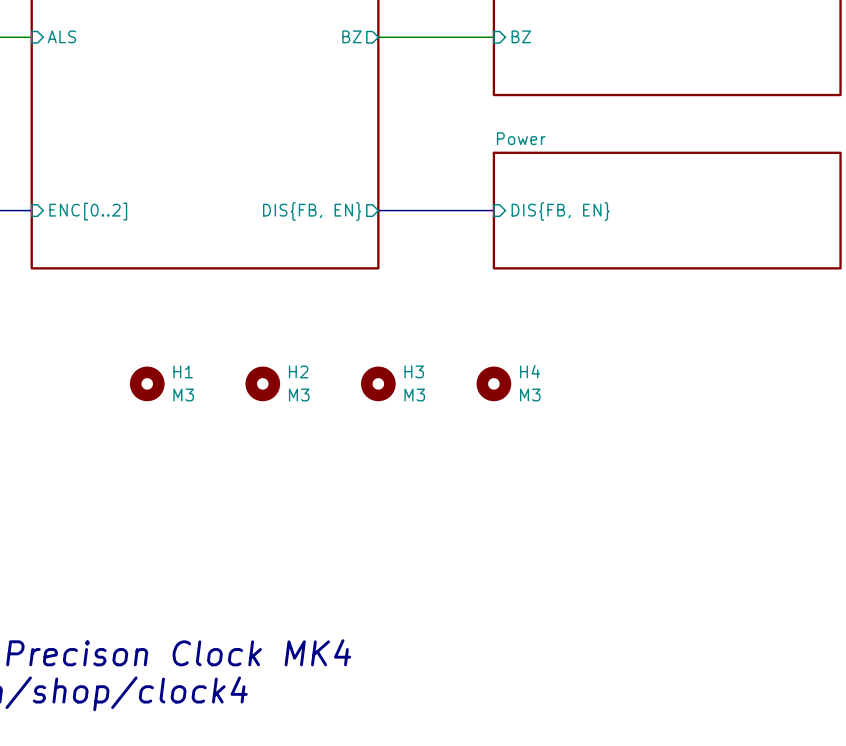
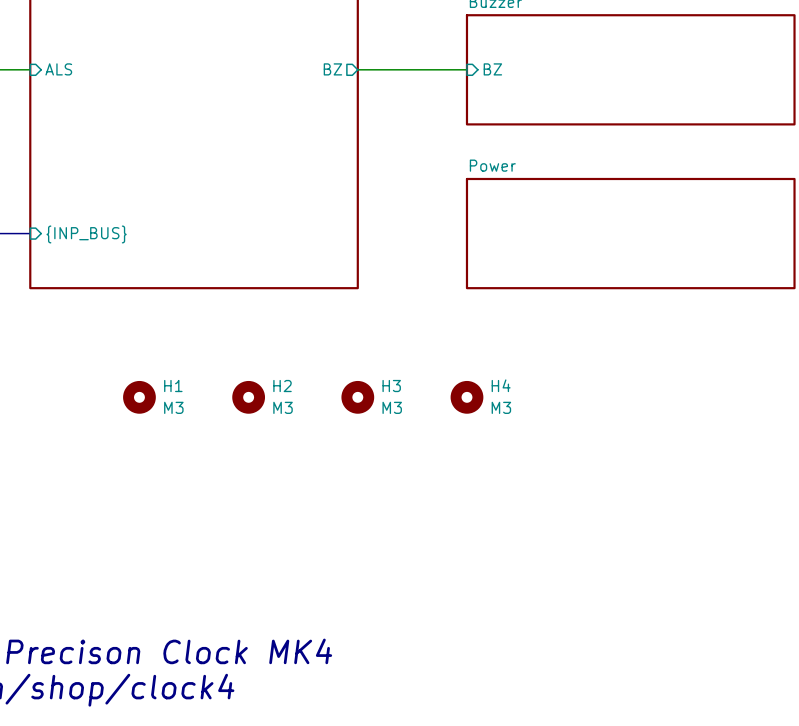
bus: (378, 210) (493, 210) -> none
sheet pin: ENC[0..2] (88, 211) -> {INP_BUS} (86, 234)
sheet pin: DIS{FB, EN} (312, 211) -> none
sheet pin: DIS{FB, EN} (560, 211) -> none

